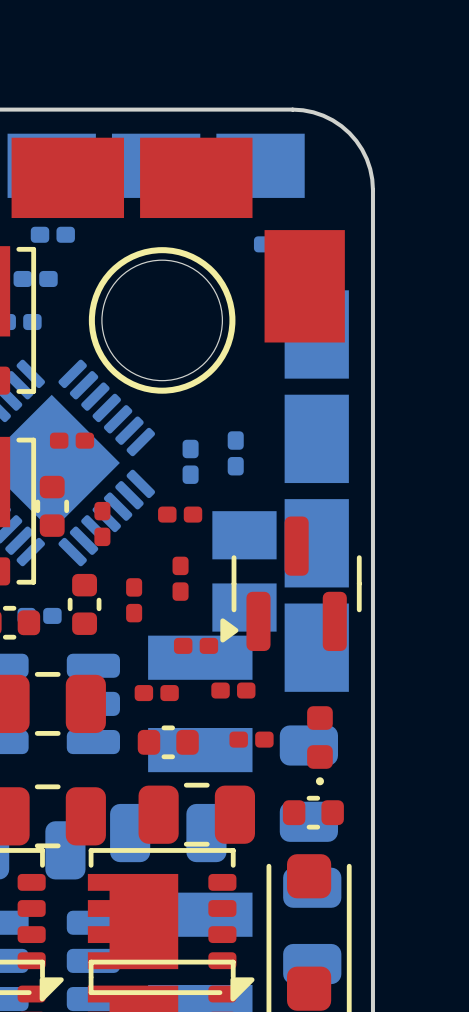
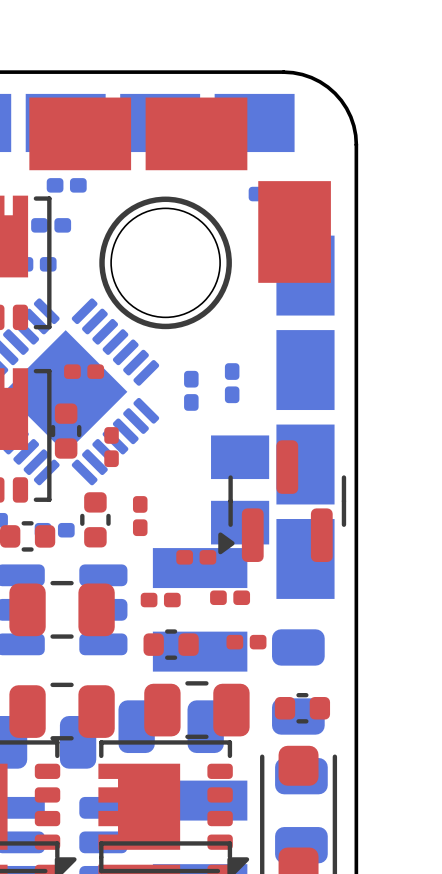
part: (180, 514) -> none
part: (180, 578) -> none
part: (319, 745) -> none

